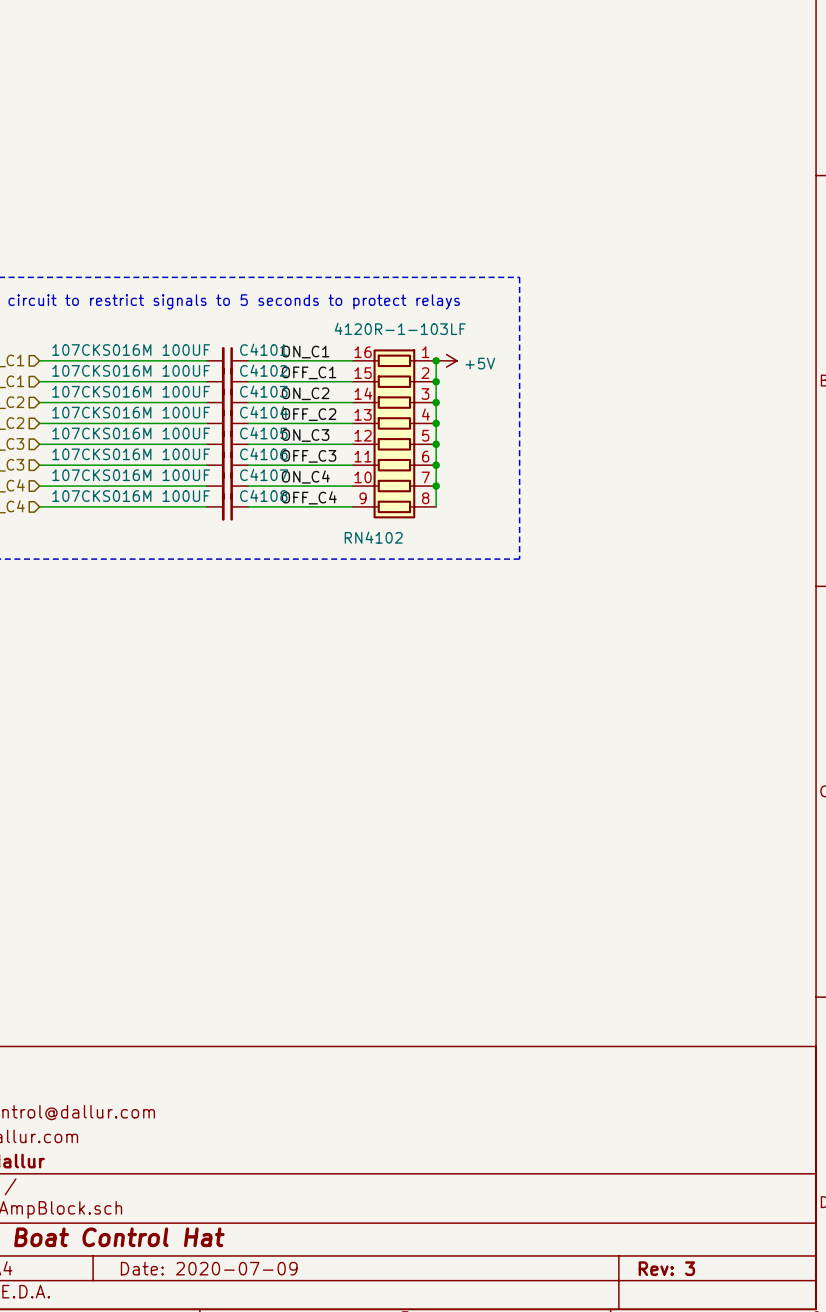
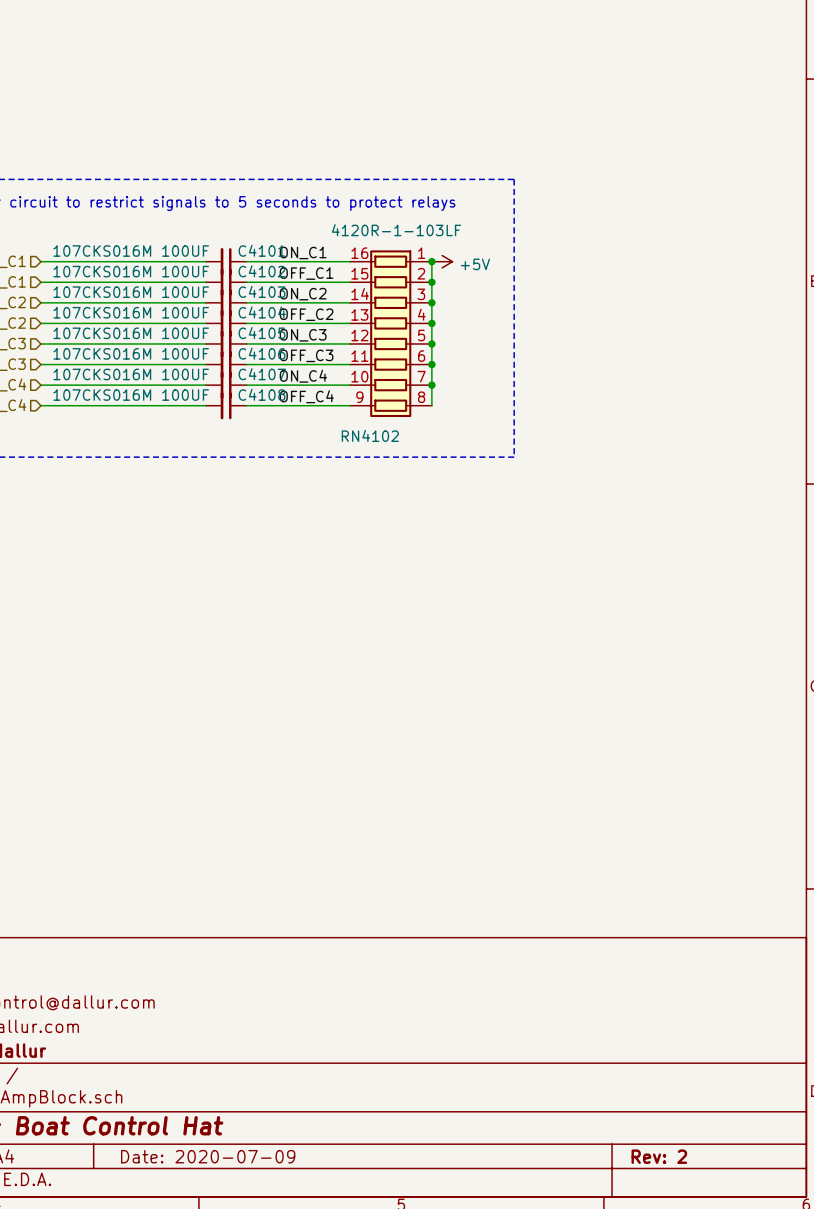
title block: Rev: 3 (666, 1268) -> Rev: 2 (659, 1156)

